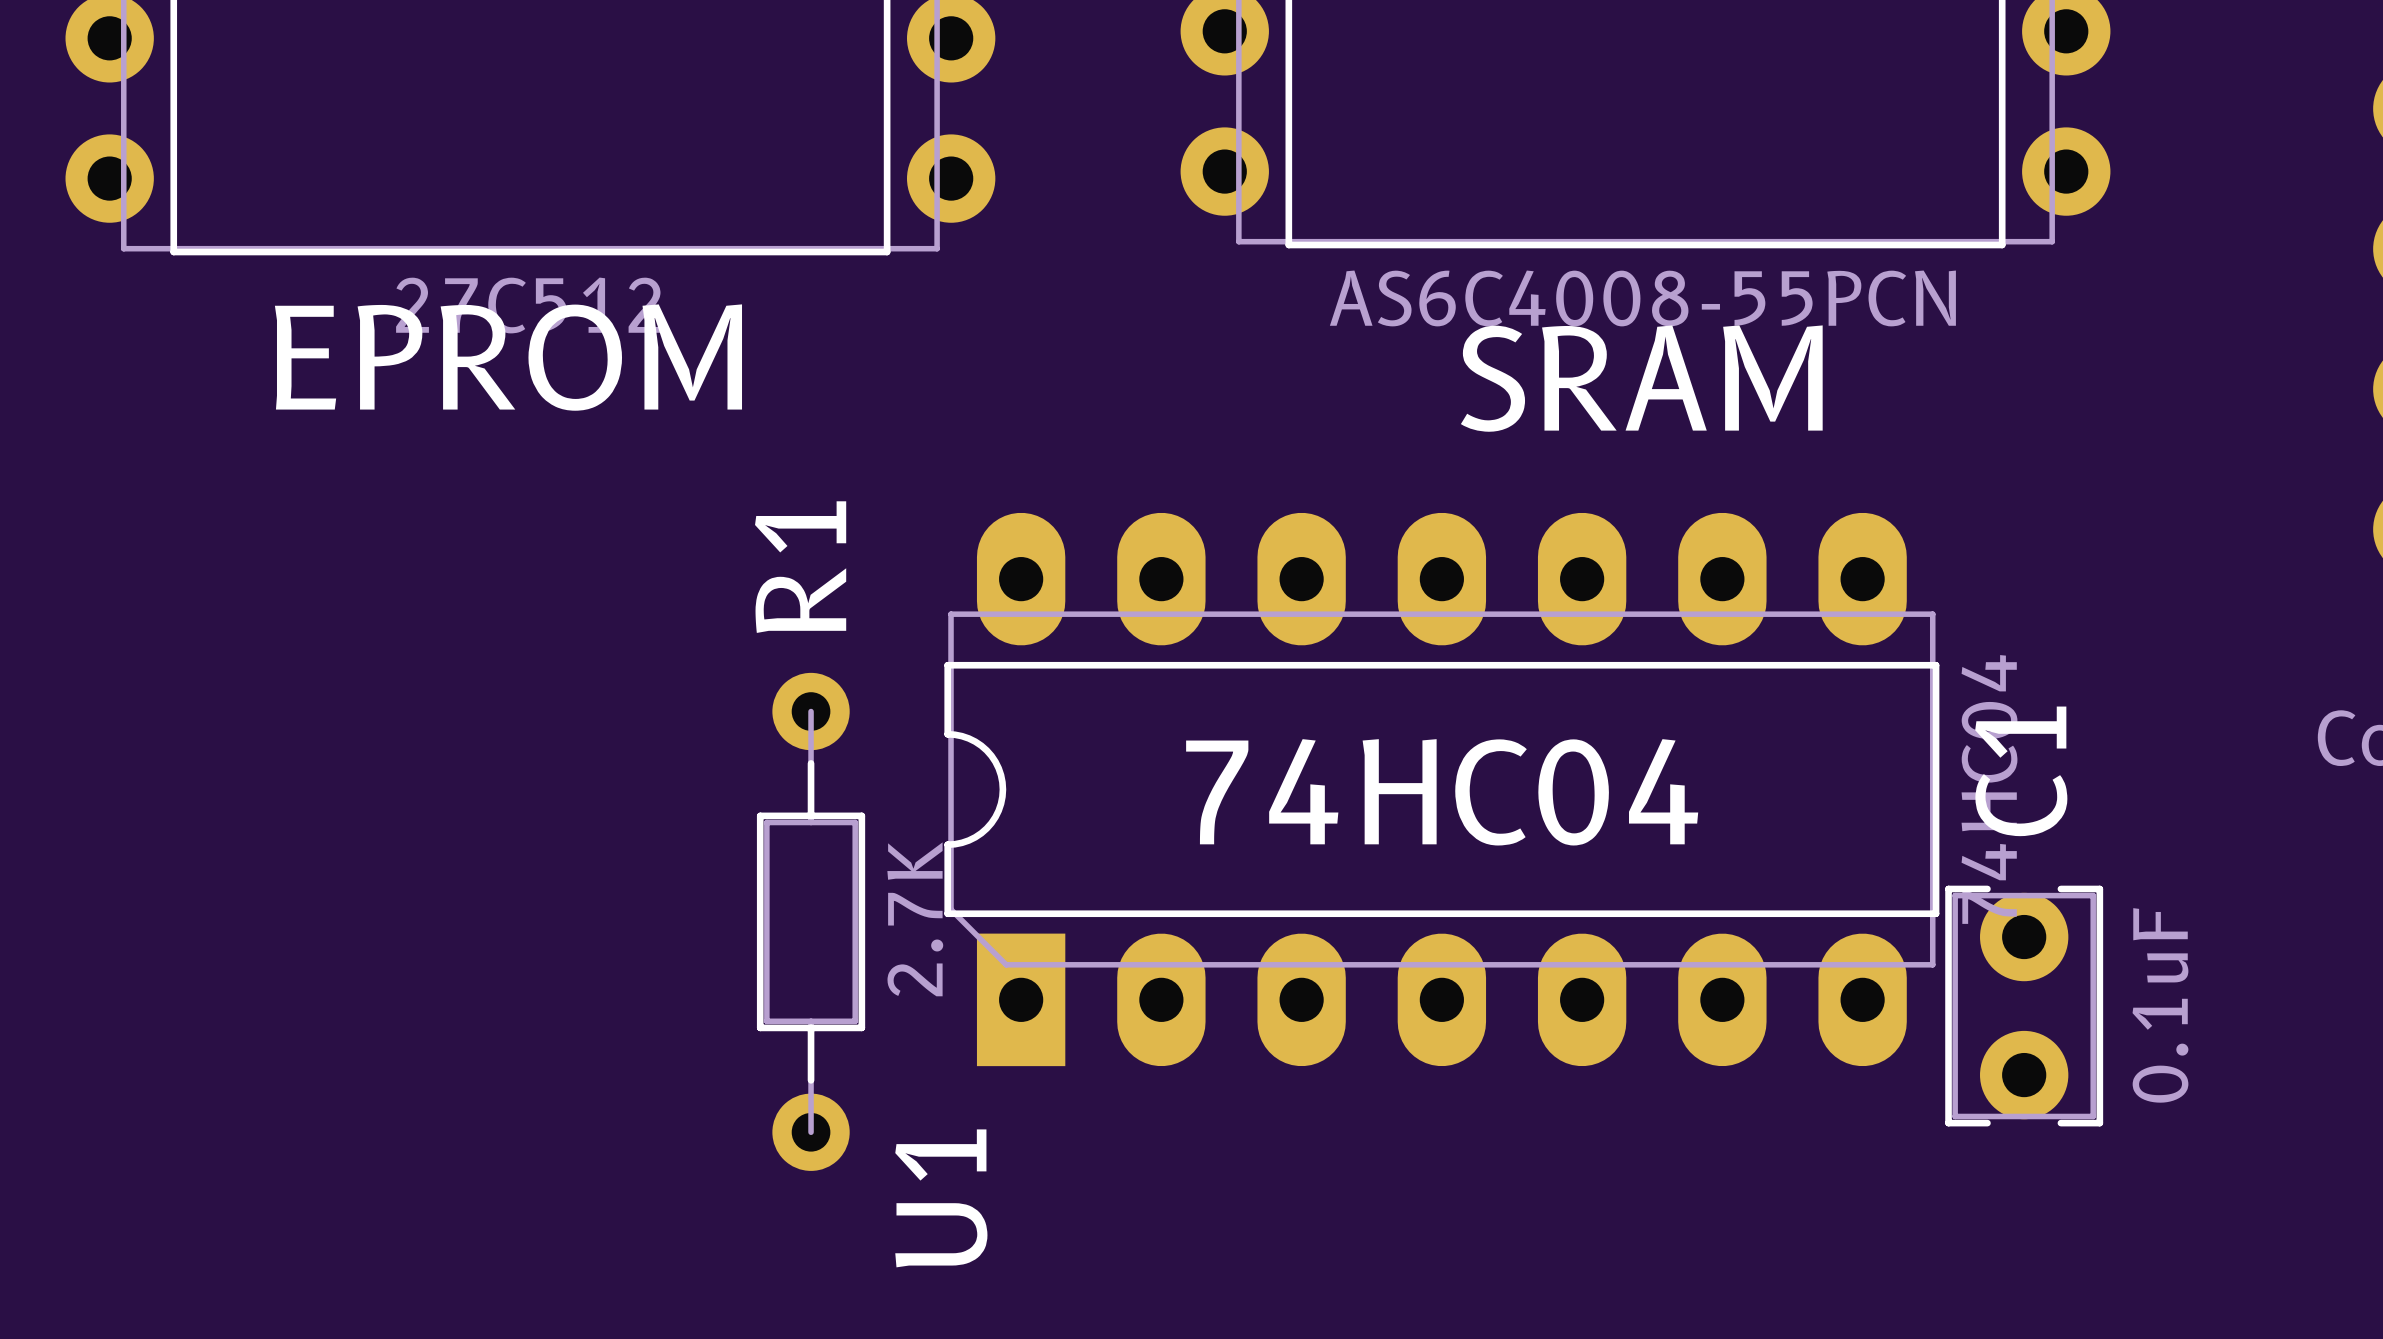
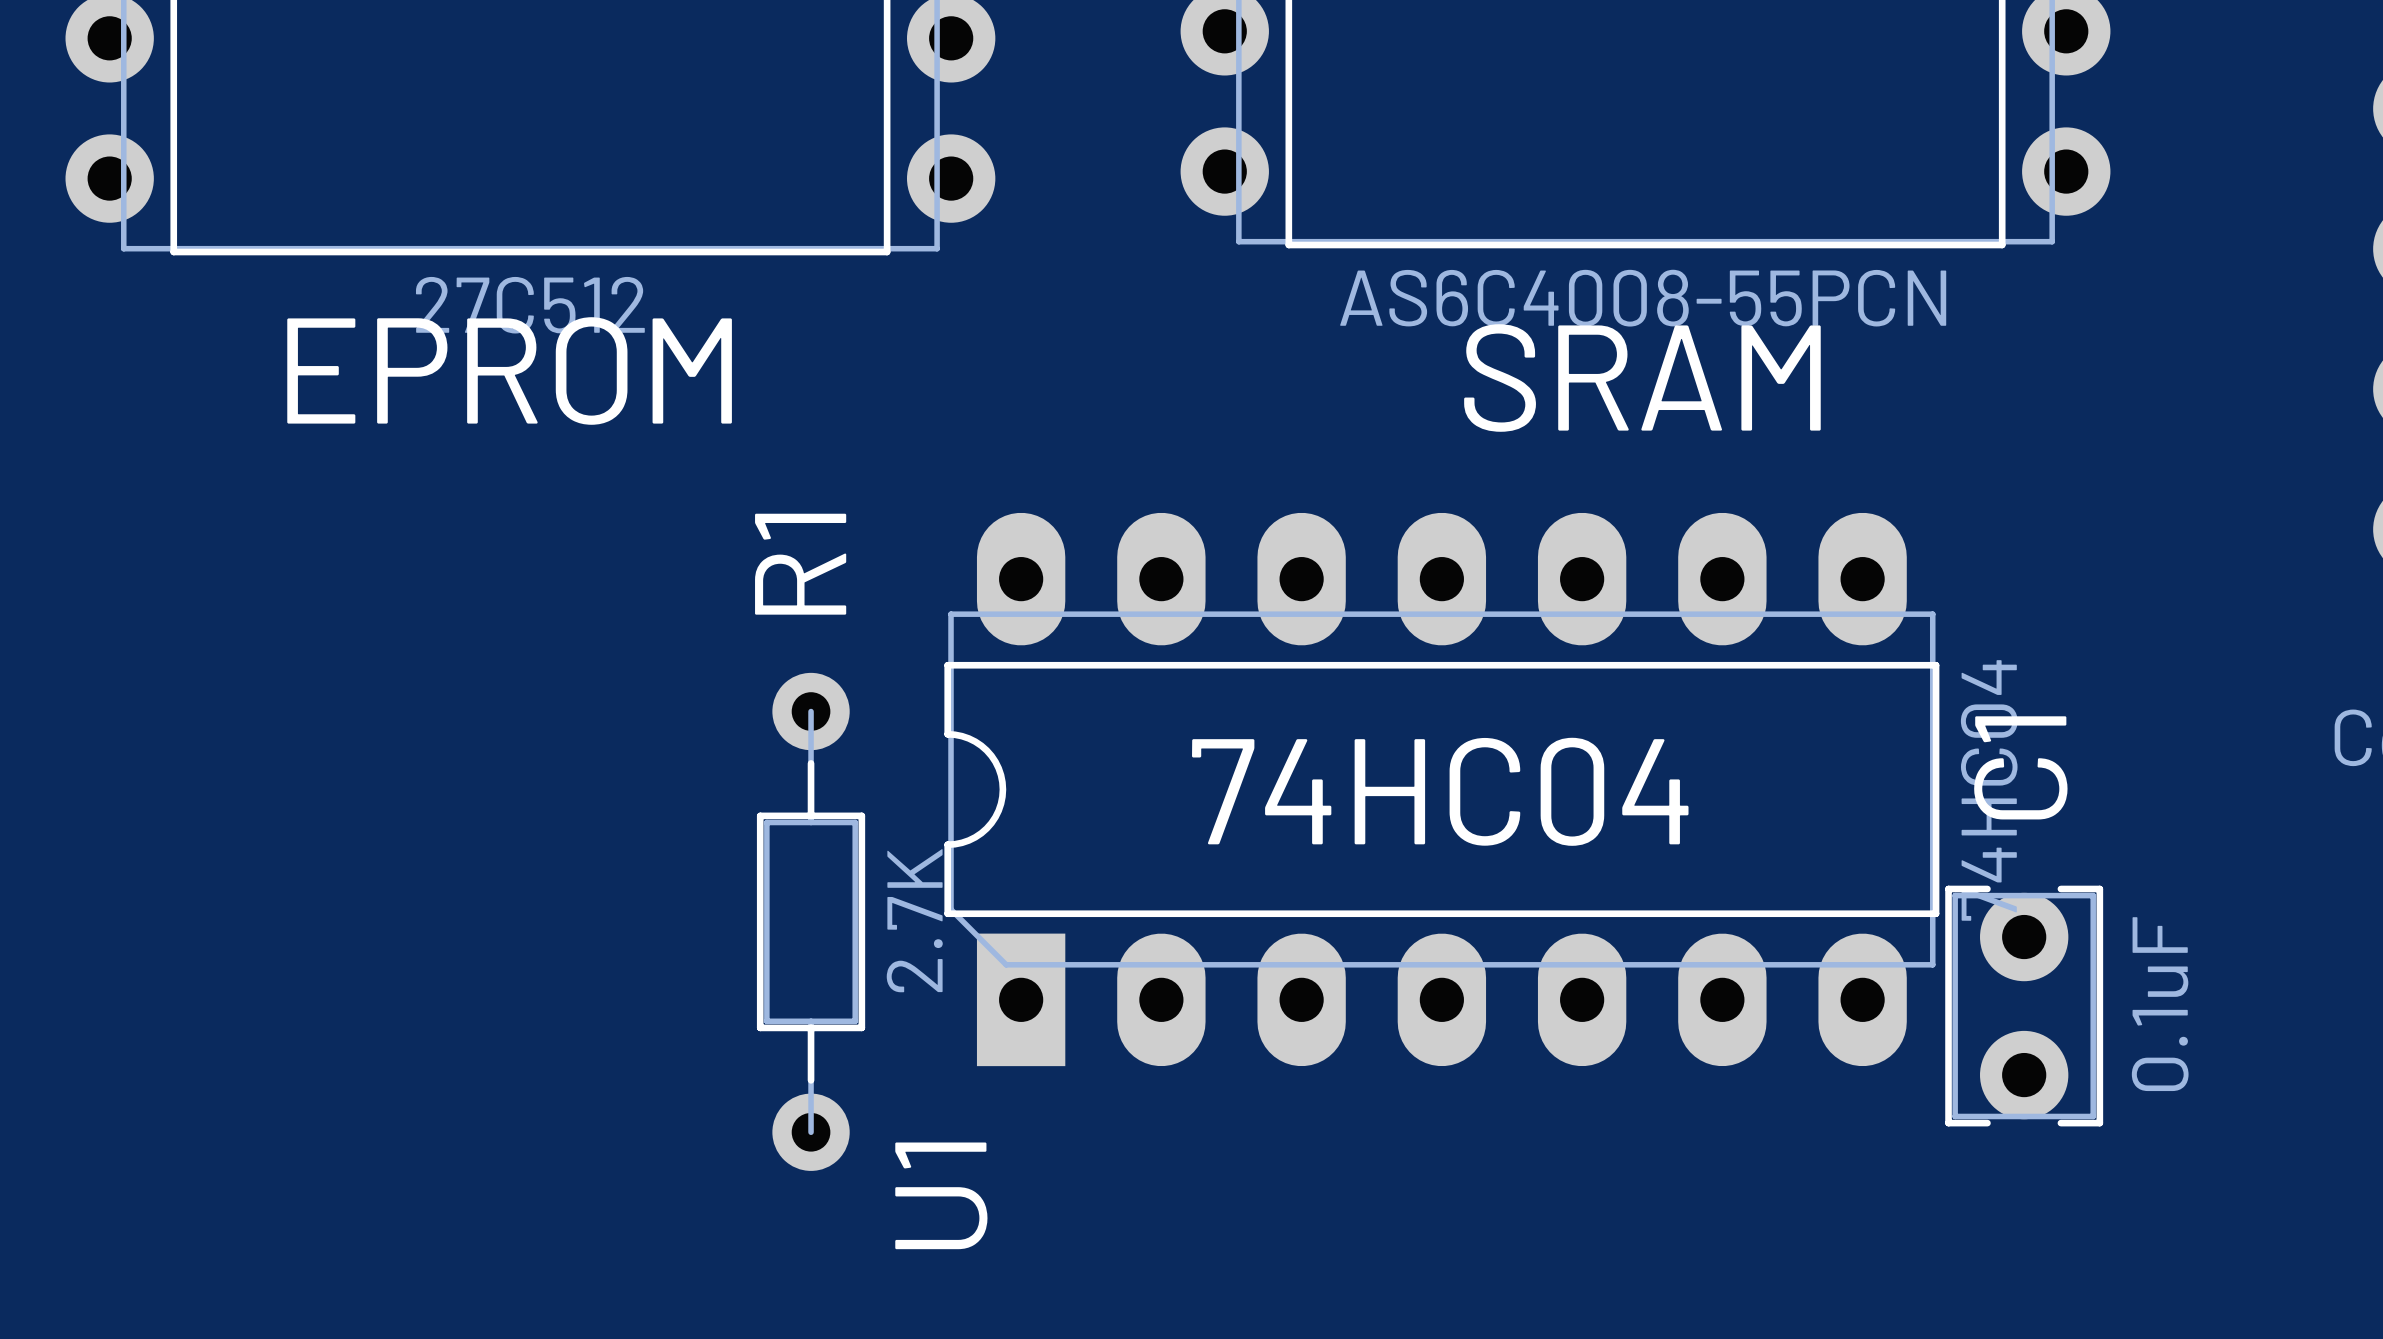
text position: EPROM (508, 357) -> EPROM (509, 370)

